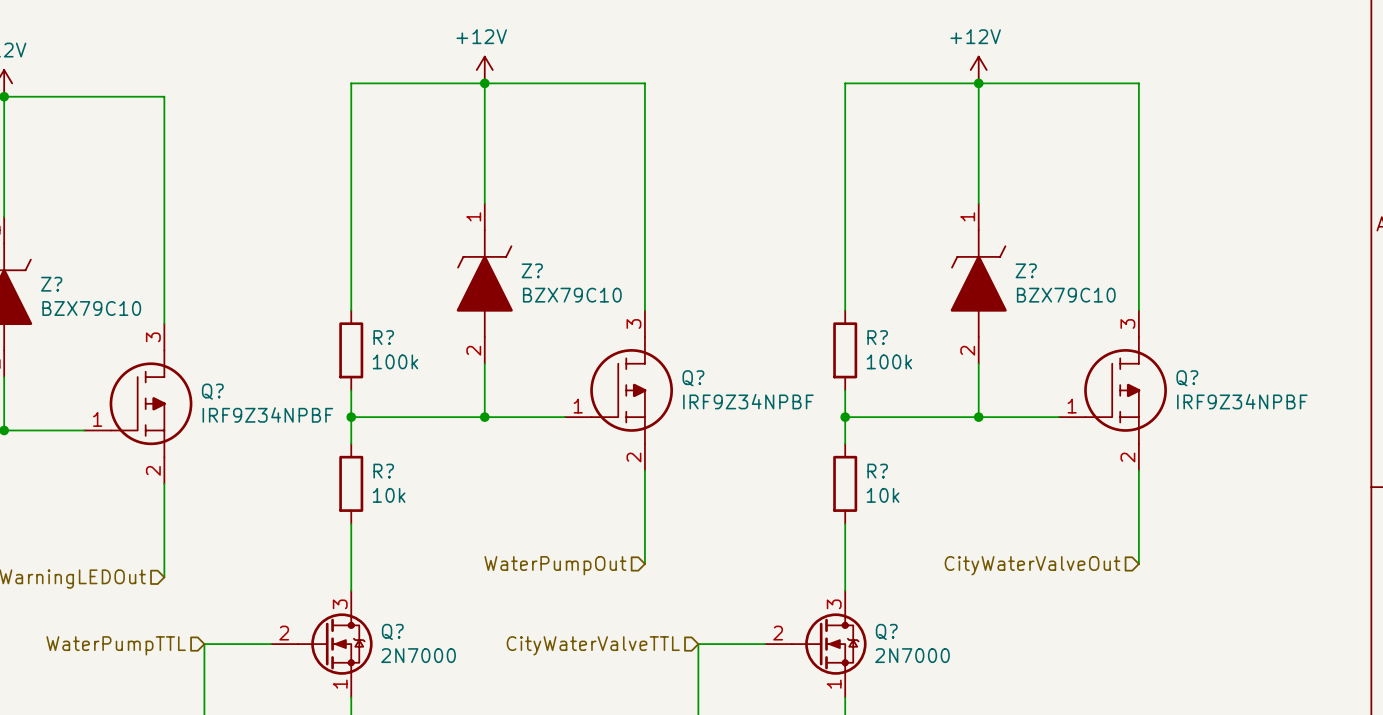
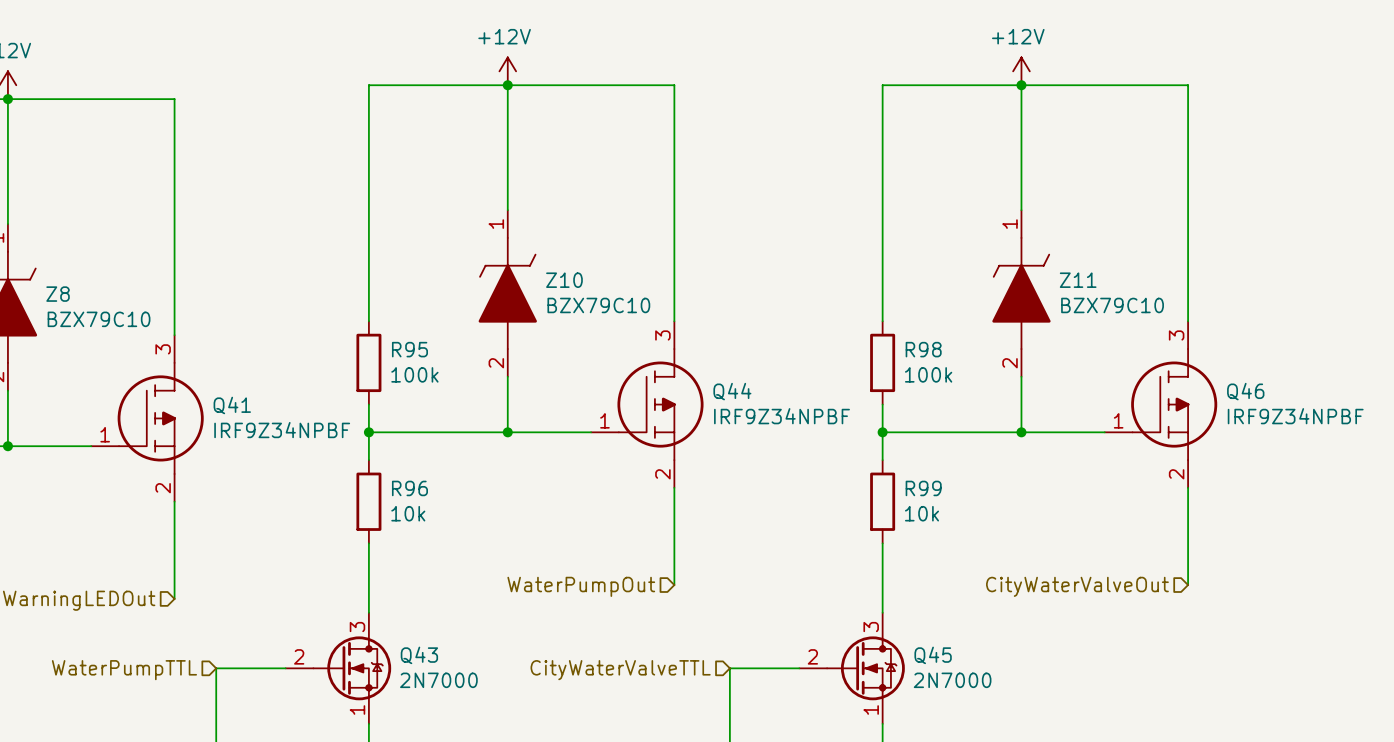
Z? name: Z? (532, 270) -> Z10 (564, 280)
Z? name: Z? (1026, 270) -> Z11 (1078, 280)
Z? name: Z? (51, 284) -> Z8 (58, 294)
R? name: R? (383, 337) -> R95 (409, 349)
R? name: R? (877, 337) -> R98 (923, 349)
Q? name: Q? (693, 378) -> Q44 (732, 391)
Q? name: Q? (1187, 378) -> Q46 (1245, 391)
Q? name: Q? (212, 391) -> Q41 (232, 405)
R? name: R? (383, 471) -> R96 (409, 488)
R? name: R? (877, 471) -> R99 (923, 488)
Q? name: Q? (392, 631) -> Q43 (419, 655)
Q? name: Q? (886, 631) -> Q45 (933, 655)

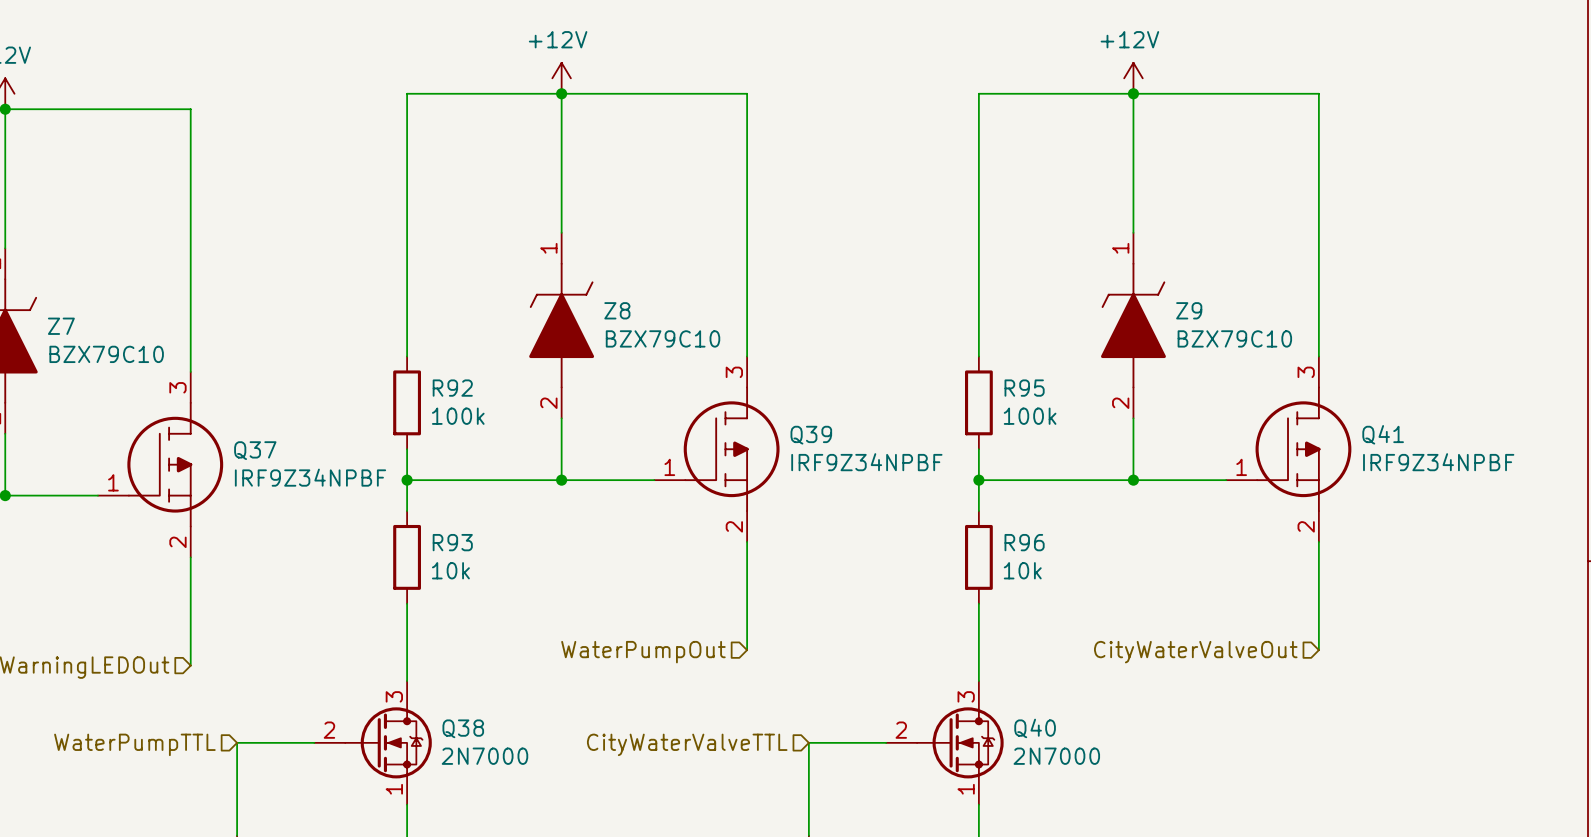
Z10 name: Z10 (564, 280) -> Z8 (617, 310)
Z11 name: Z11 (1078, 280) -> Z9 (1189, 310)
Z8 name: Z8 (58, 294) -> Z7 (61, 326)
R95 name: R95 (409, 349) -> R92 (452, 388)
R98 name: R98 (923, 349) -> R95 (1024, 388)
Q44 name: Q44 (732, 391) -> Q39 (811, 435)
Q46 name: Q46 (1245, 391) -> Q41 (1383, 434)
Q41 name: Q41 (232, 405) -> Q37 (255, 450)
R96 name: R96 (409, 488) -> R93 (452, 542)
R99 name: R99 (923, 488) -> R96 (1024, 542)
Q43 name: Q43 (419, 655) -> Q38 (463, 728)
Q45 name: Q45 (933, 655) -> Q40 (1035, 728)

